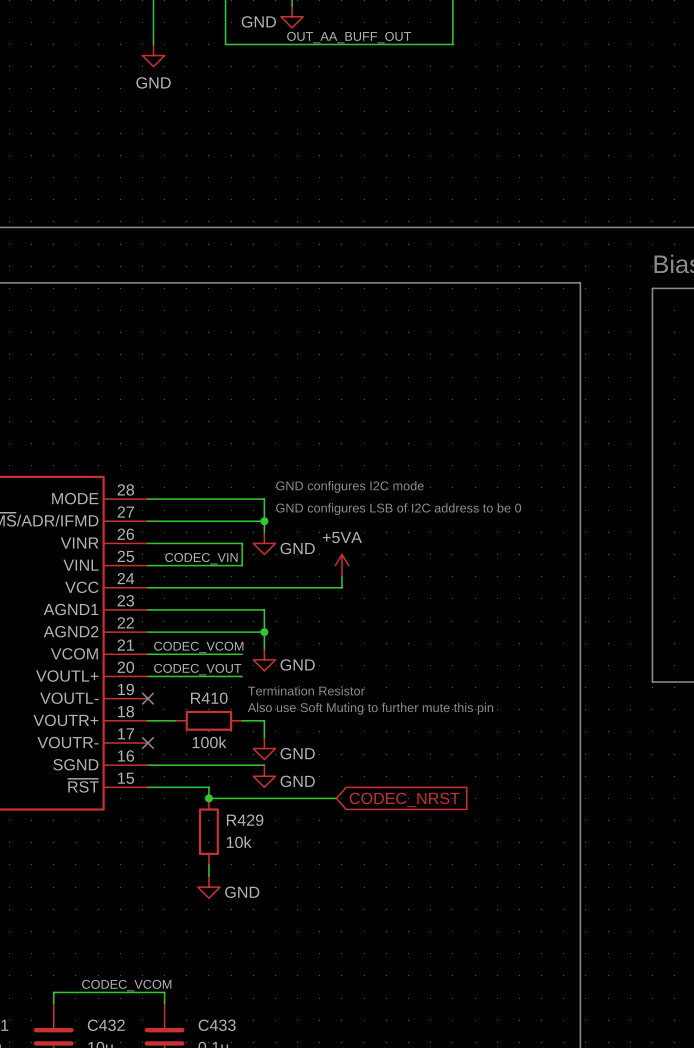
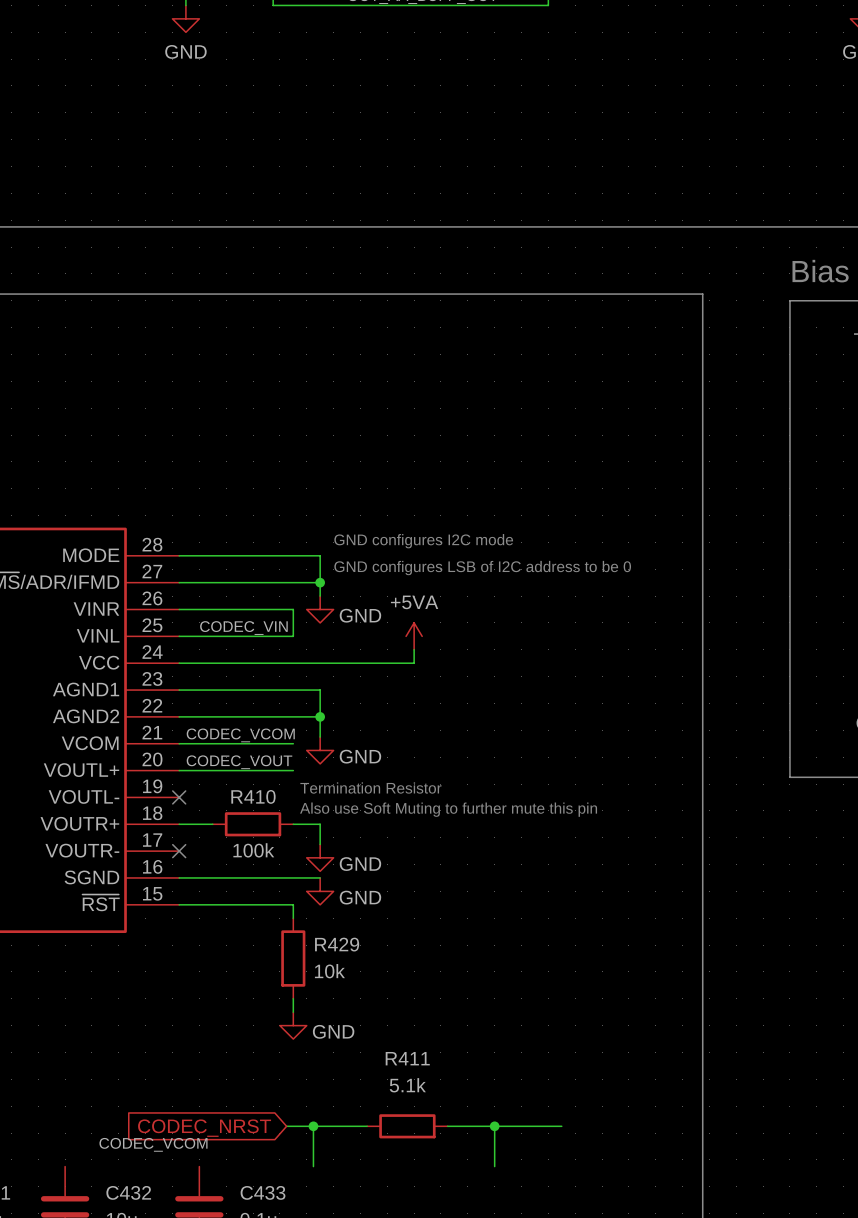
wire: (208, 787) (208, 798) (336, 798) -> (253, 904) (293, 904) (293, 918)
junction: (208, 798) -> none
global label rotation: 0° (404, 799) -> 180° (204, 1128)
global label position: CODEC_NRST (404, 799) -> CODEC_NRST (204, 1128)
R429 position: (208, 831) -> (293, 958)
wire: (208, 864) (208, 876) -> (293, 998) (293, 1012)
power symbol position: GND (208, 887) -> GND (293, 1025)
wire: none -> (286, 1126) (367, 1126)
wire: none -> (313, 1126) (313, 1166)
junction: none -> (313, 1126)
R411: none -> 5.1k (407, 1126)
wire: none -> (447, 1126) (561, 1126)
wire: none -> (494, 1126) (494, 1166)
junction: none -> (494, 1126)
wire: (53, 1003) (53, 992) (164, 992) (164, 1003) -> none

